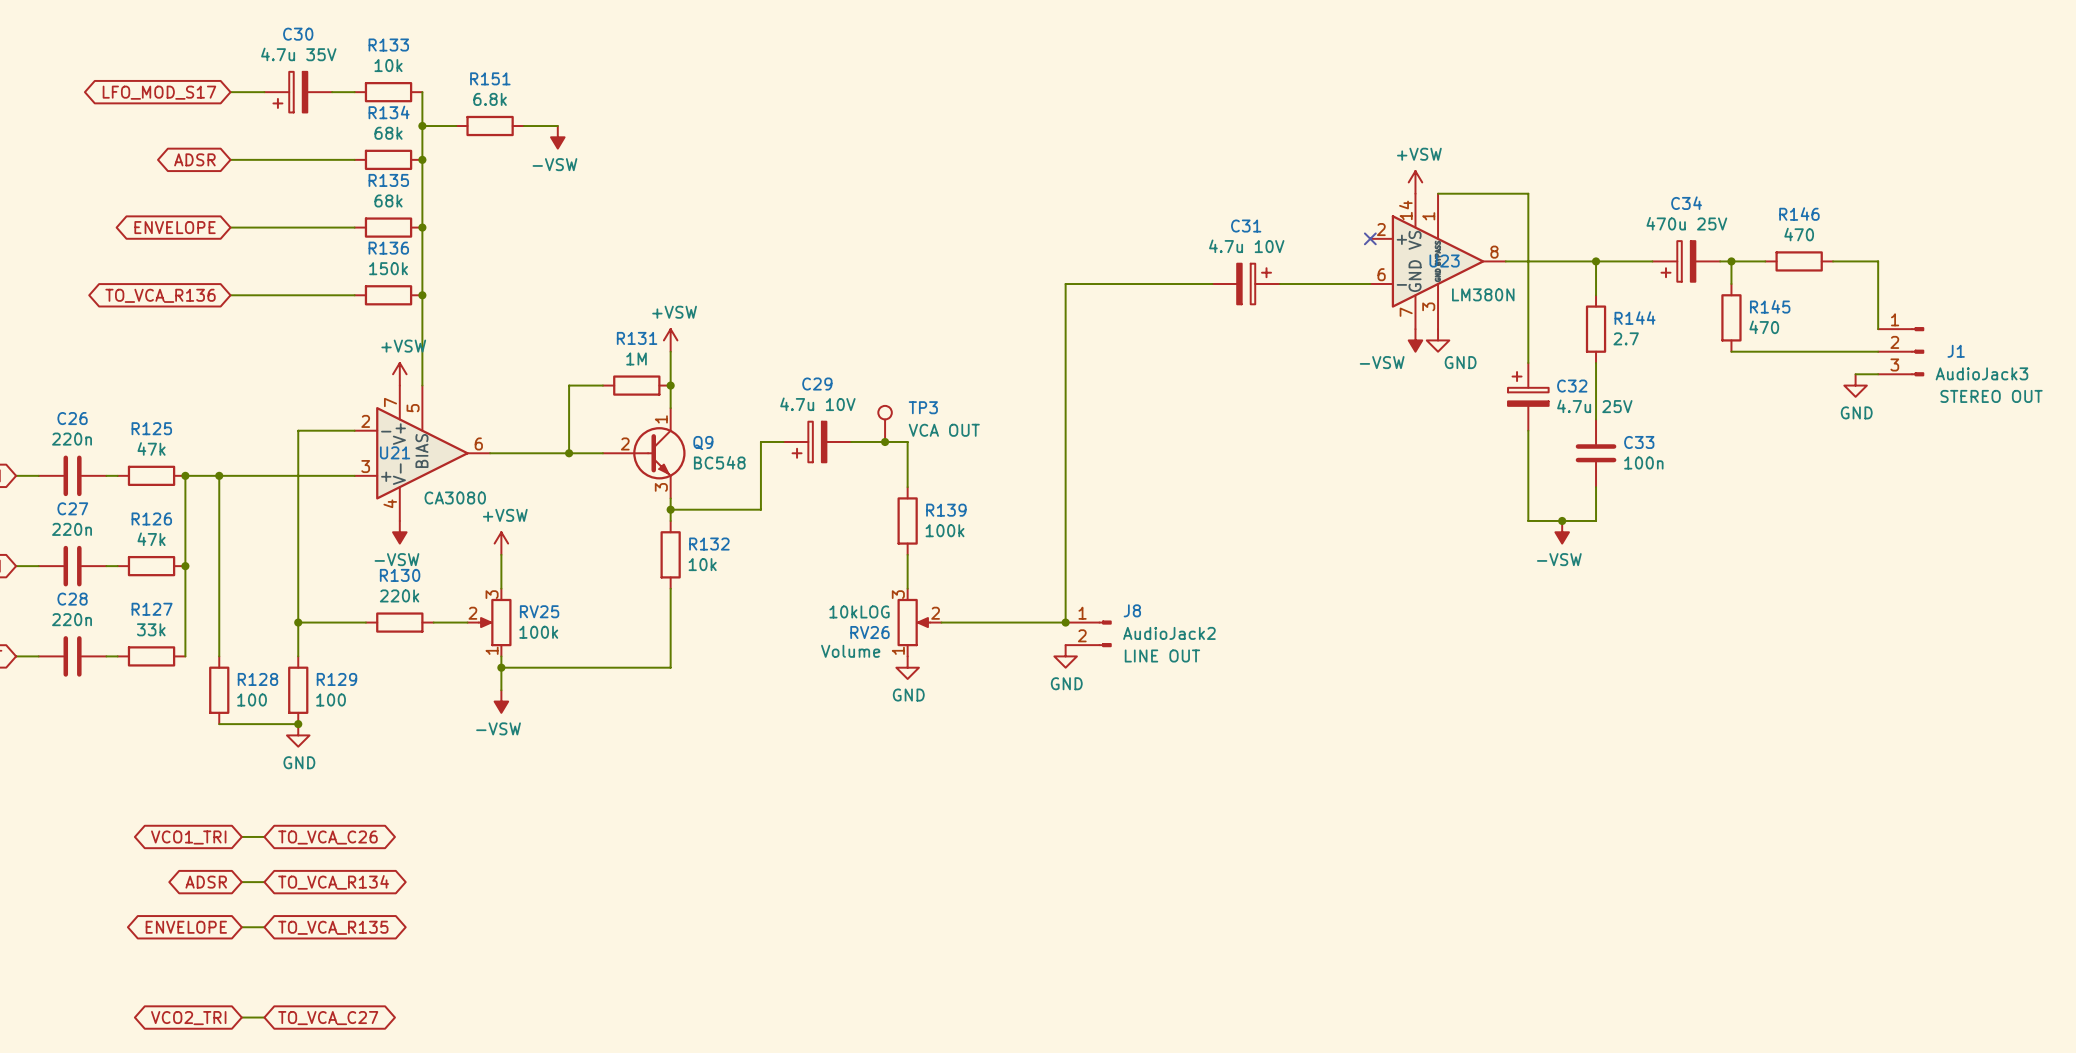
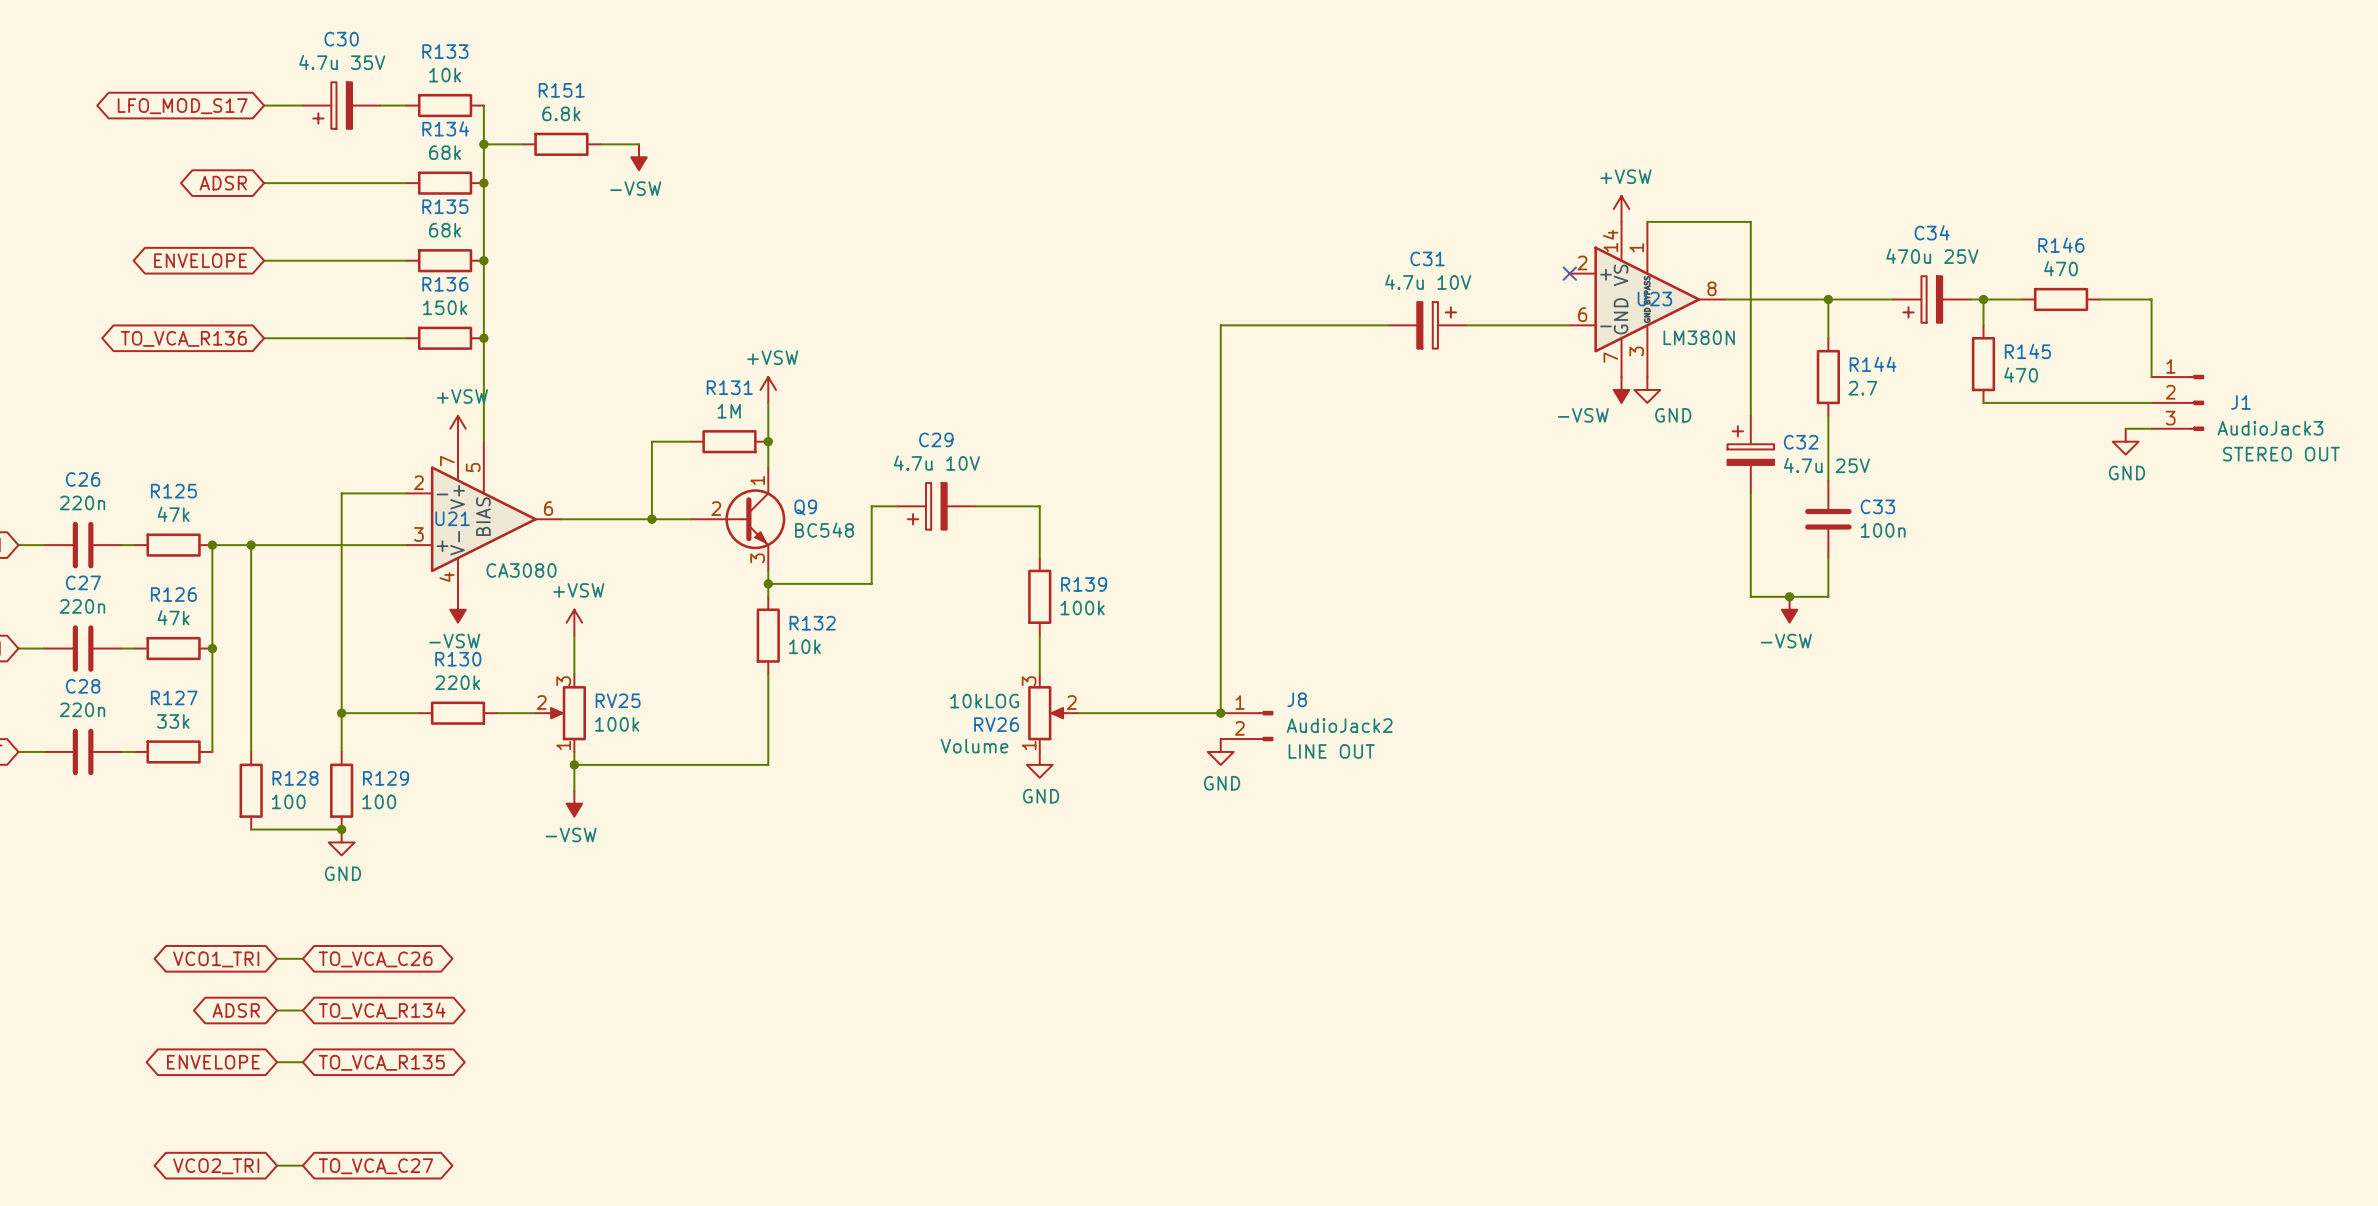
TP3: VCA OUT (885, 423) -> none
junction: (885, 441) -> none

